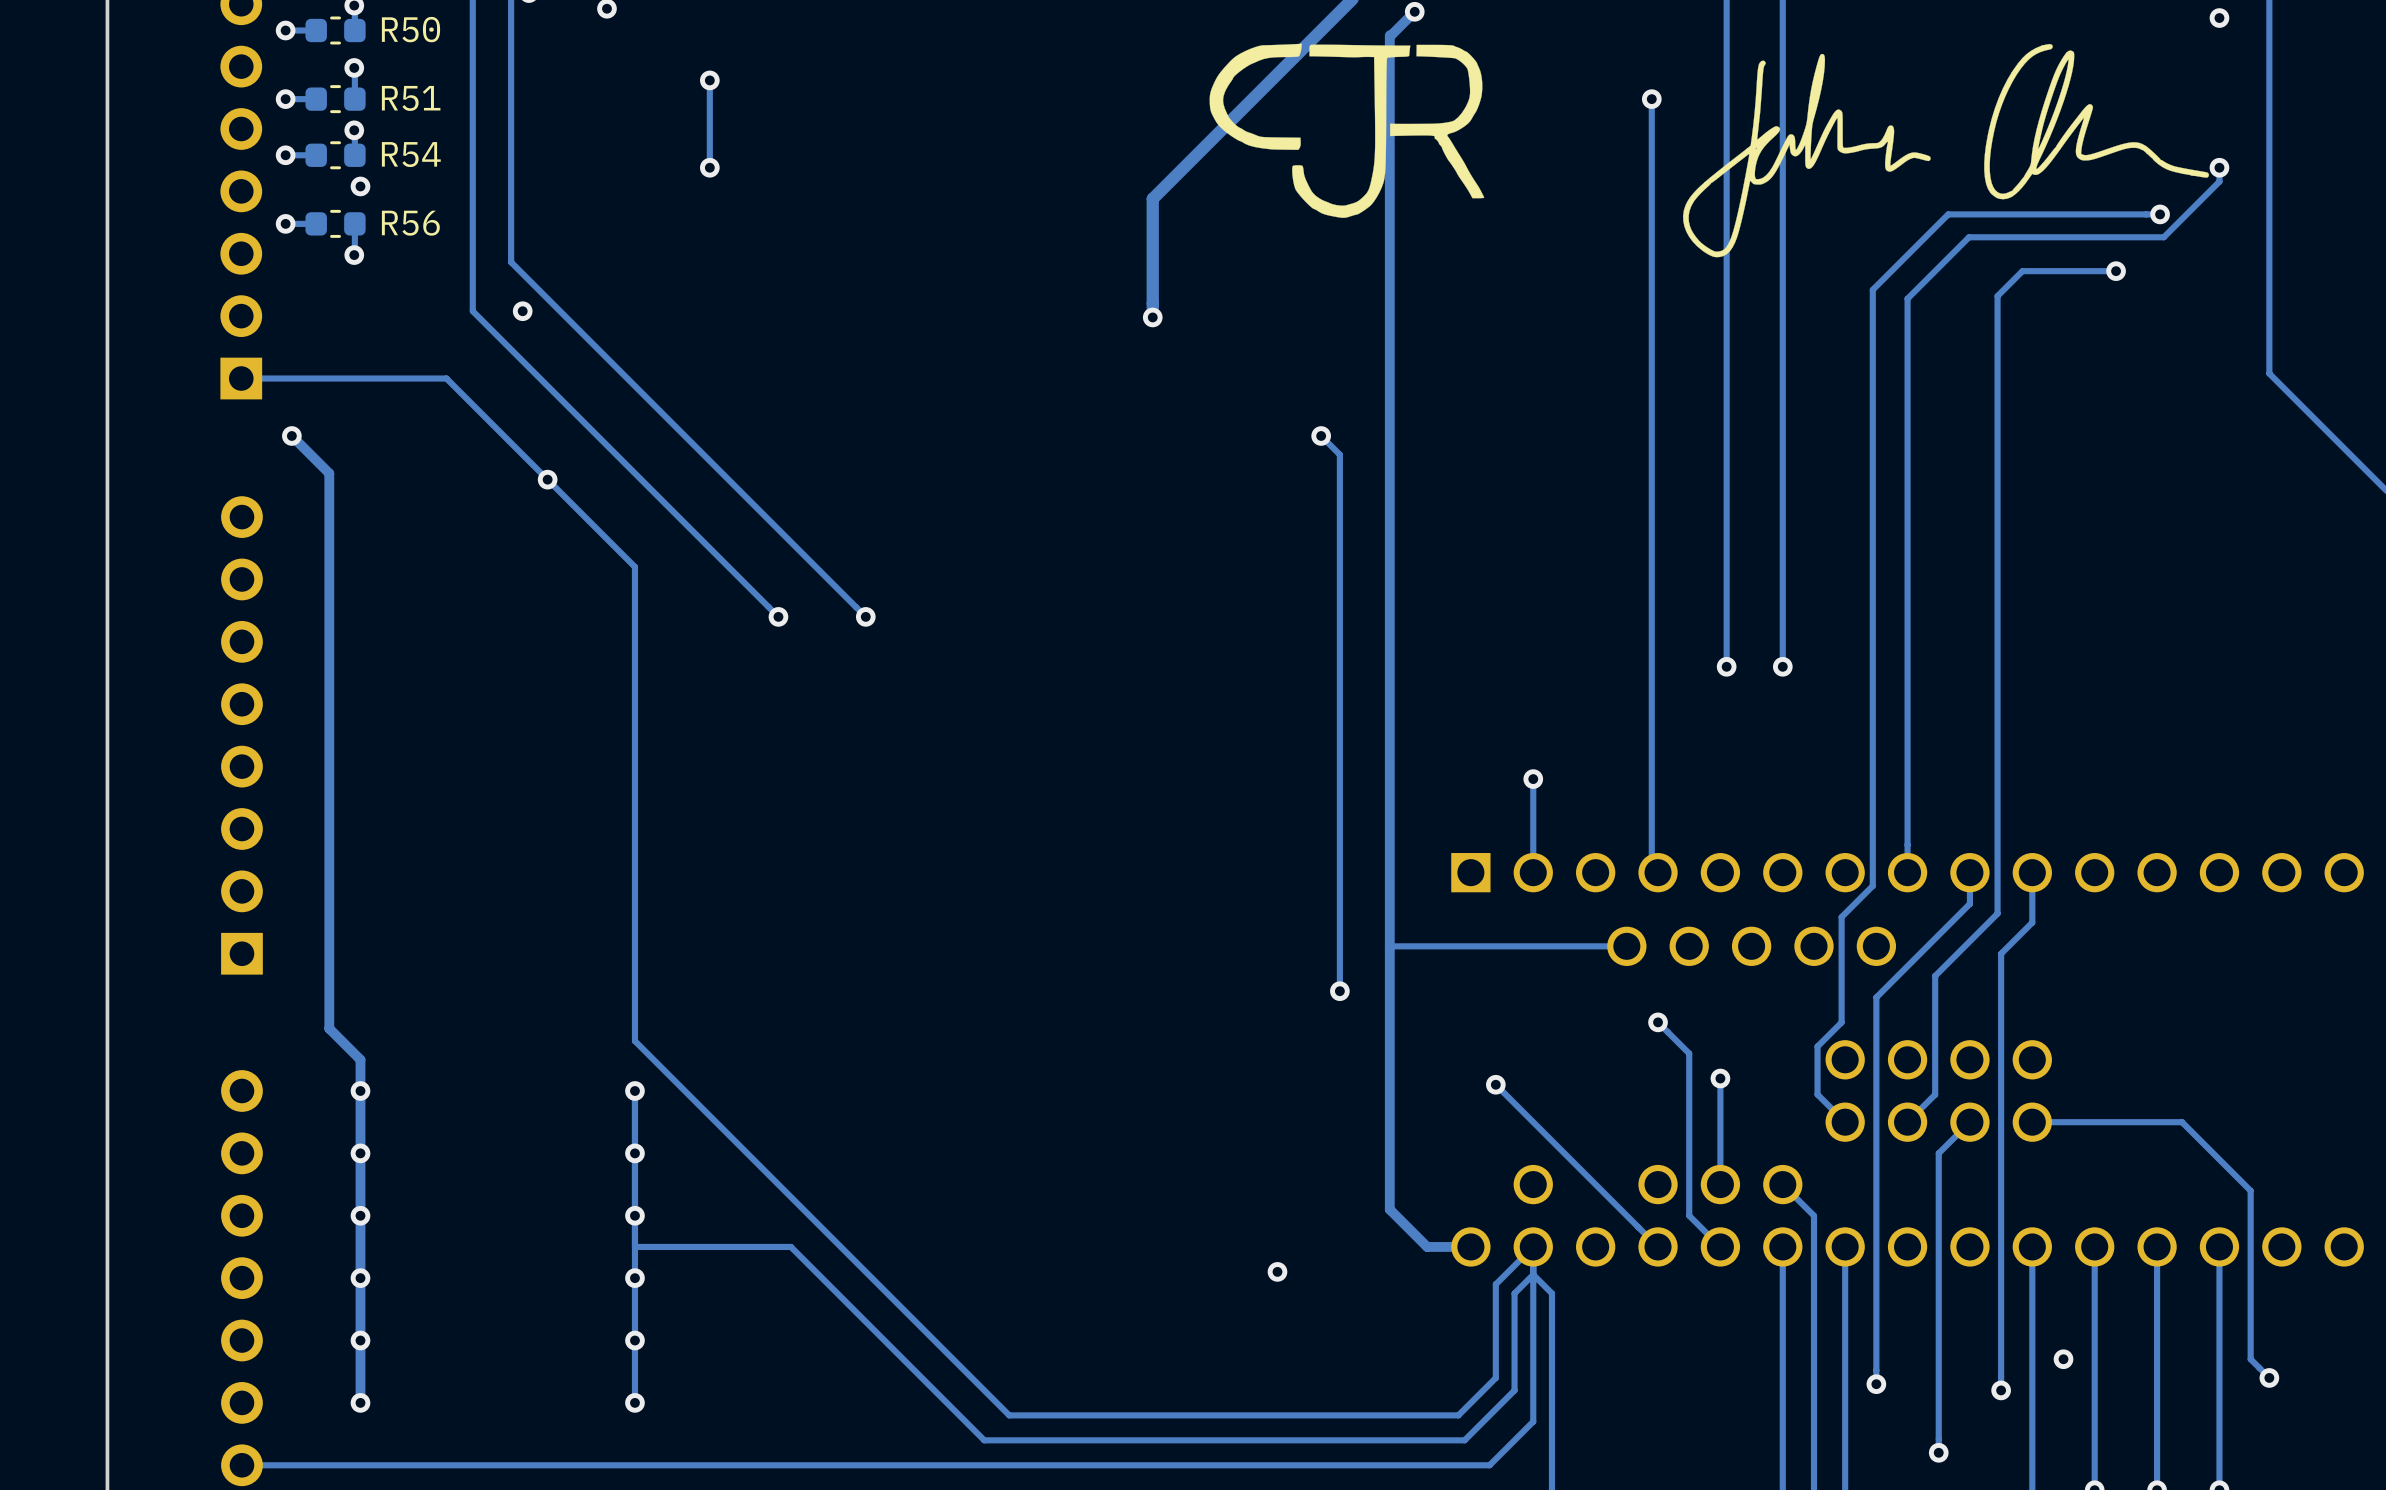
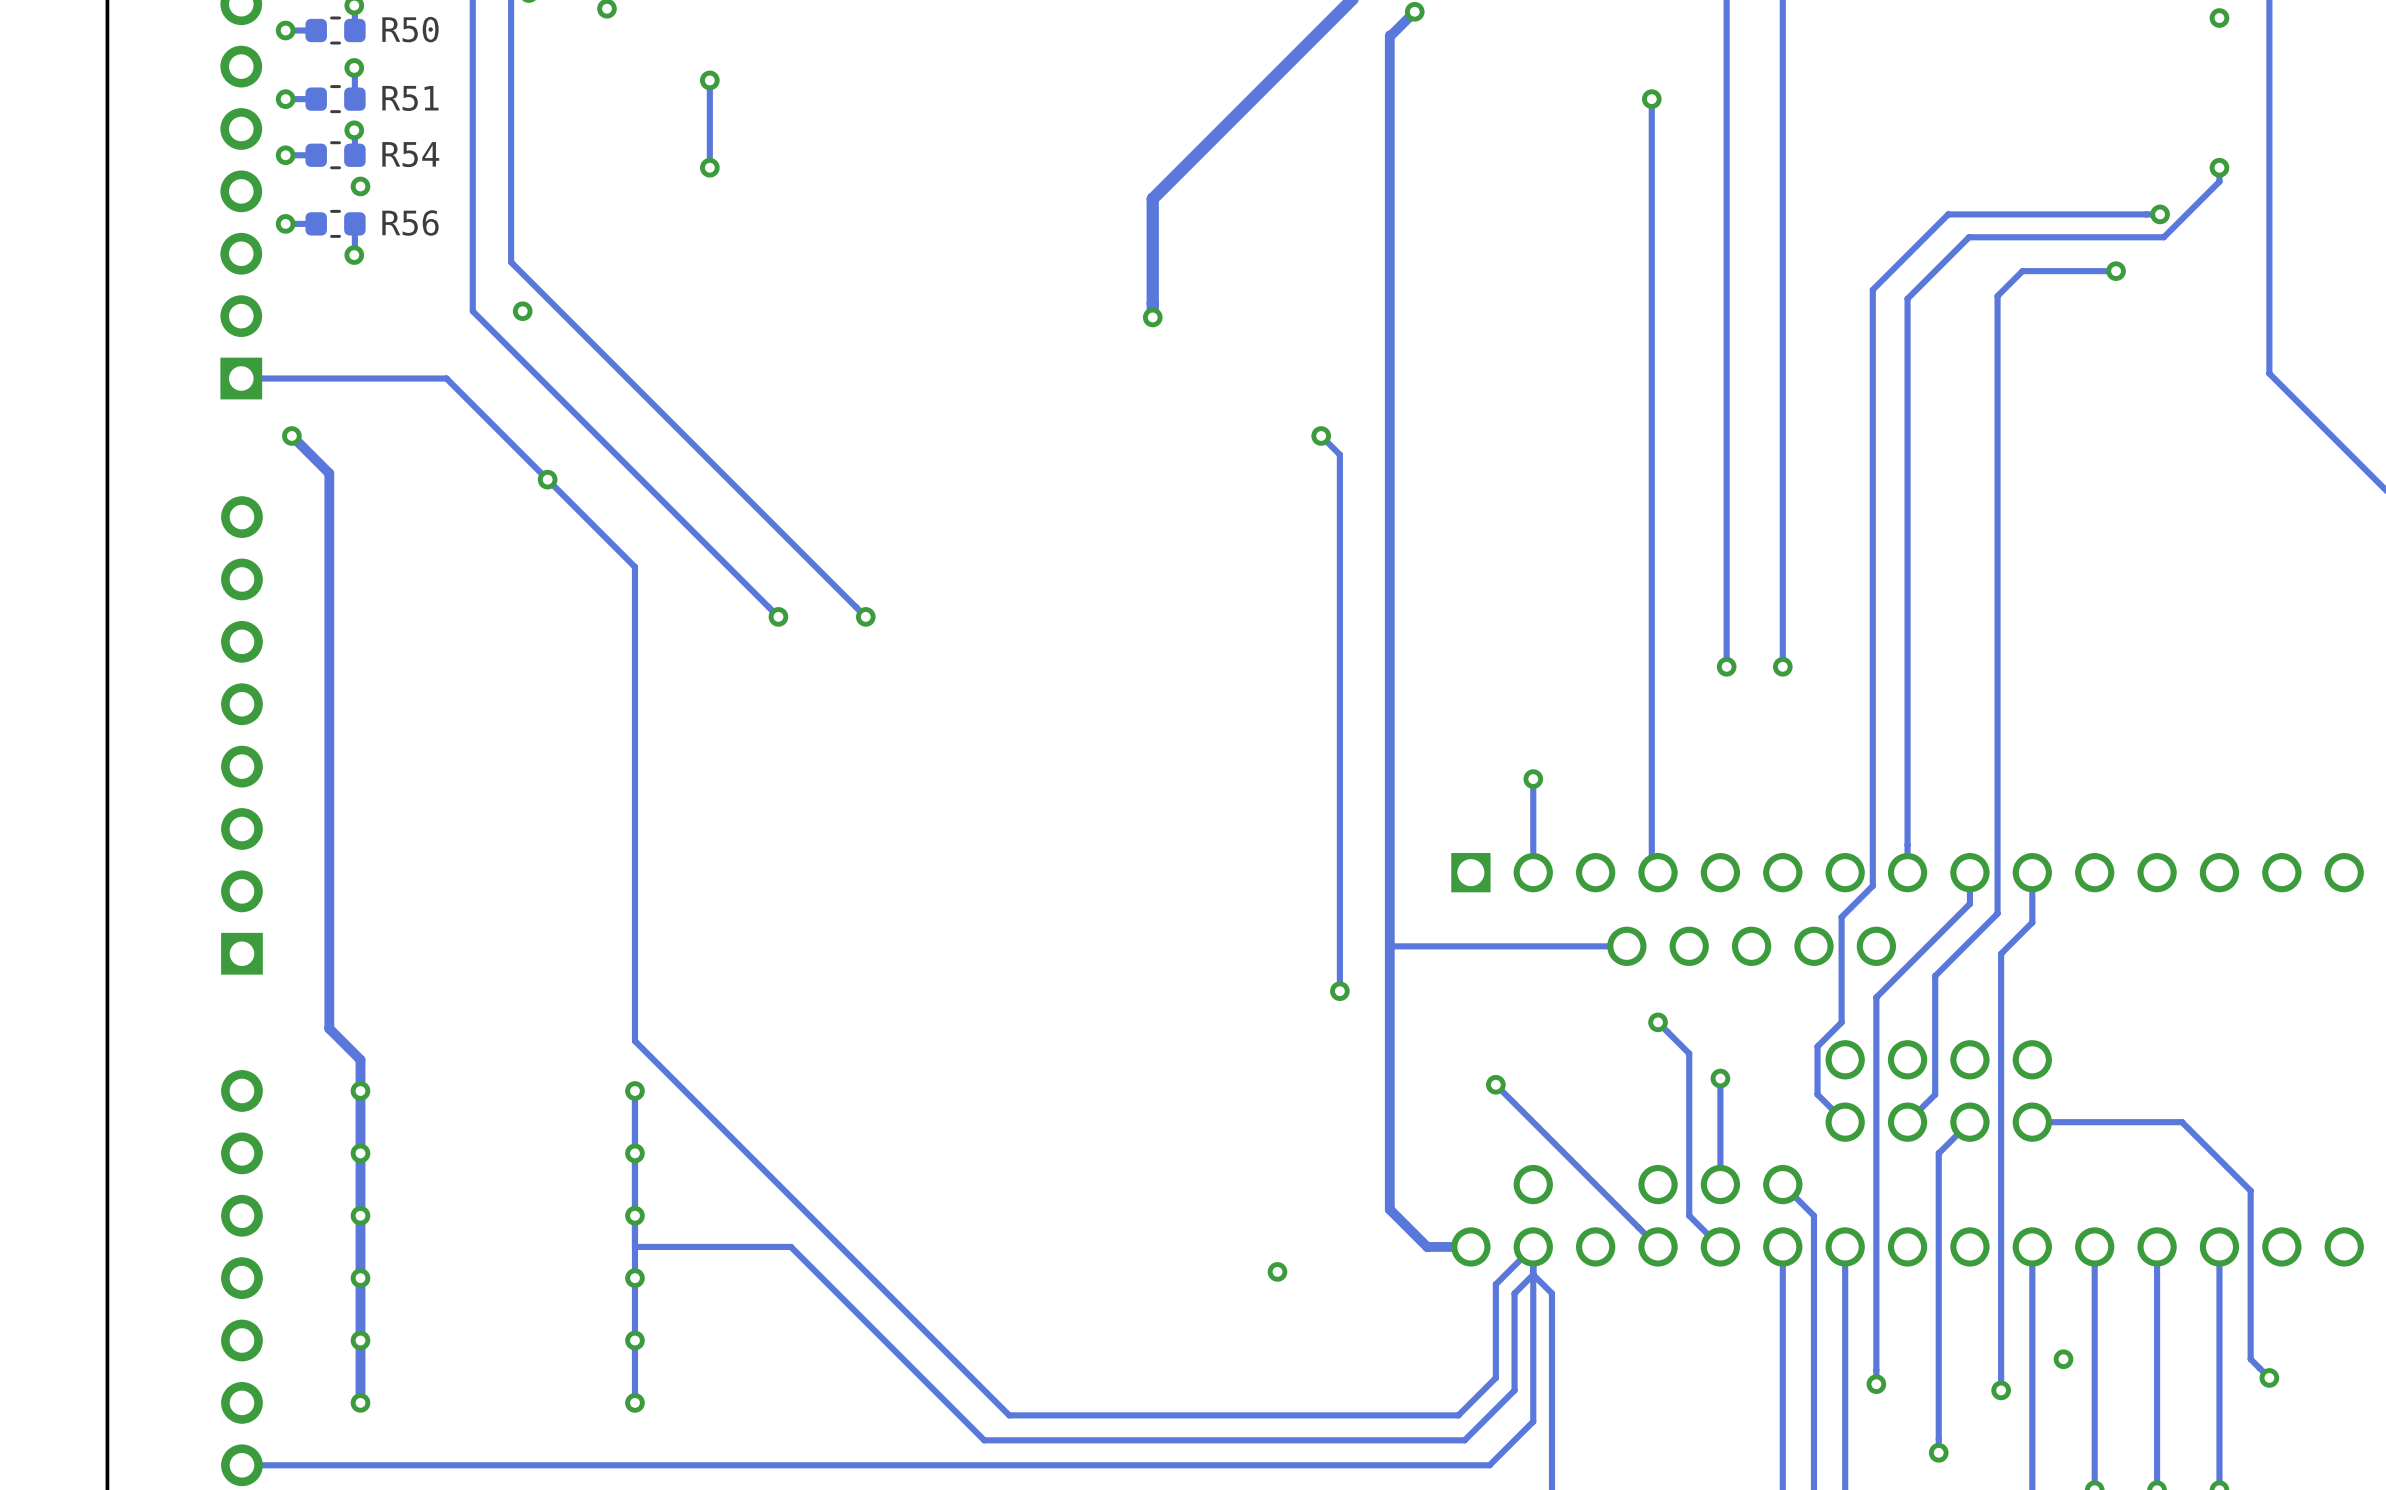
drawing: [1209, 43, 1485, 218] -> none
drawing: [1683, 44, 2209, 258] -> none

